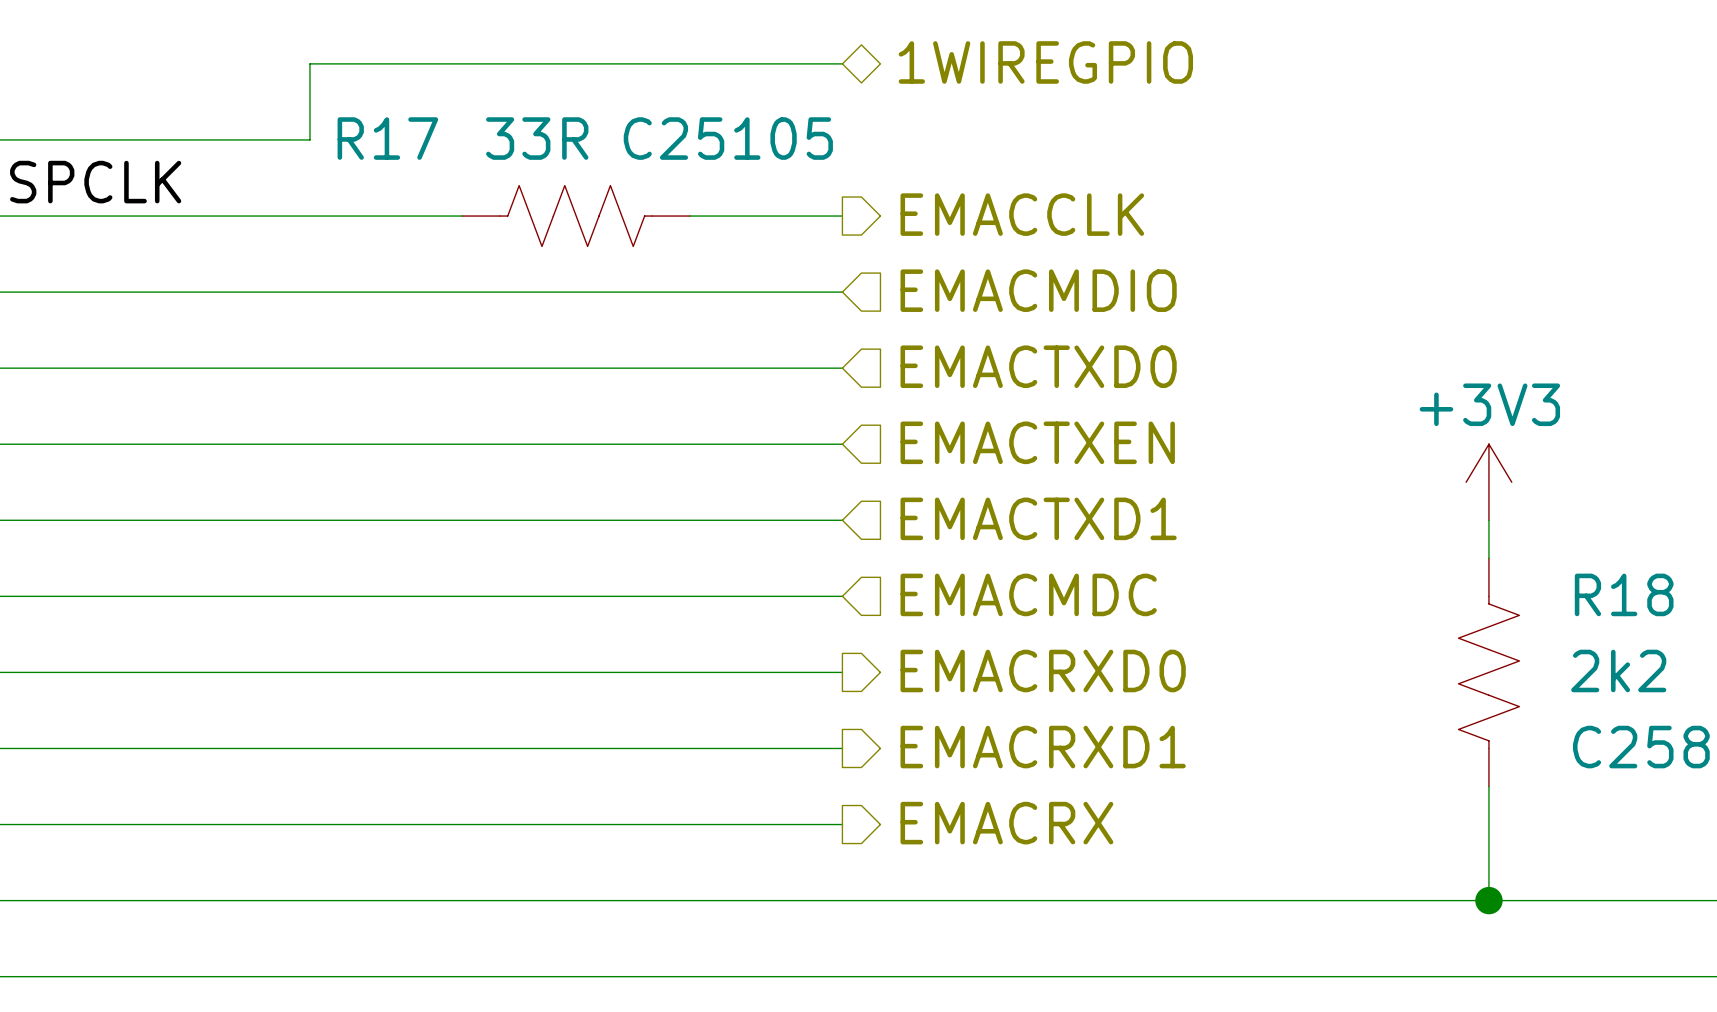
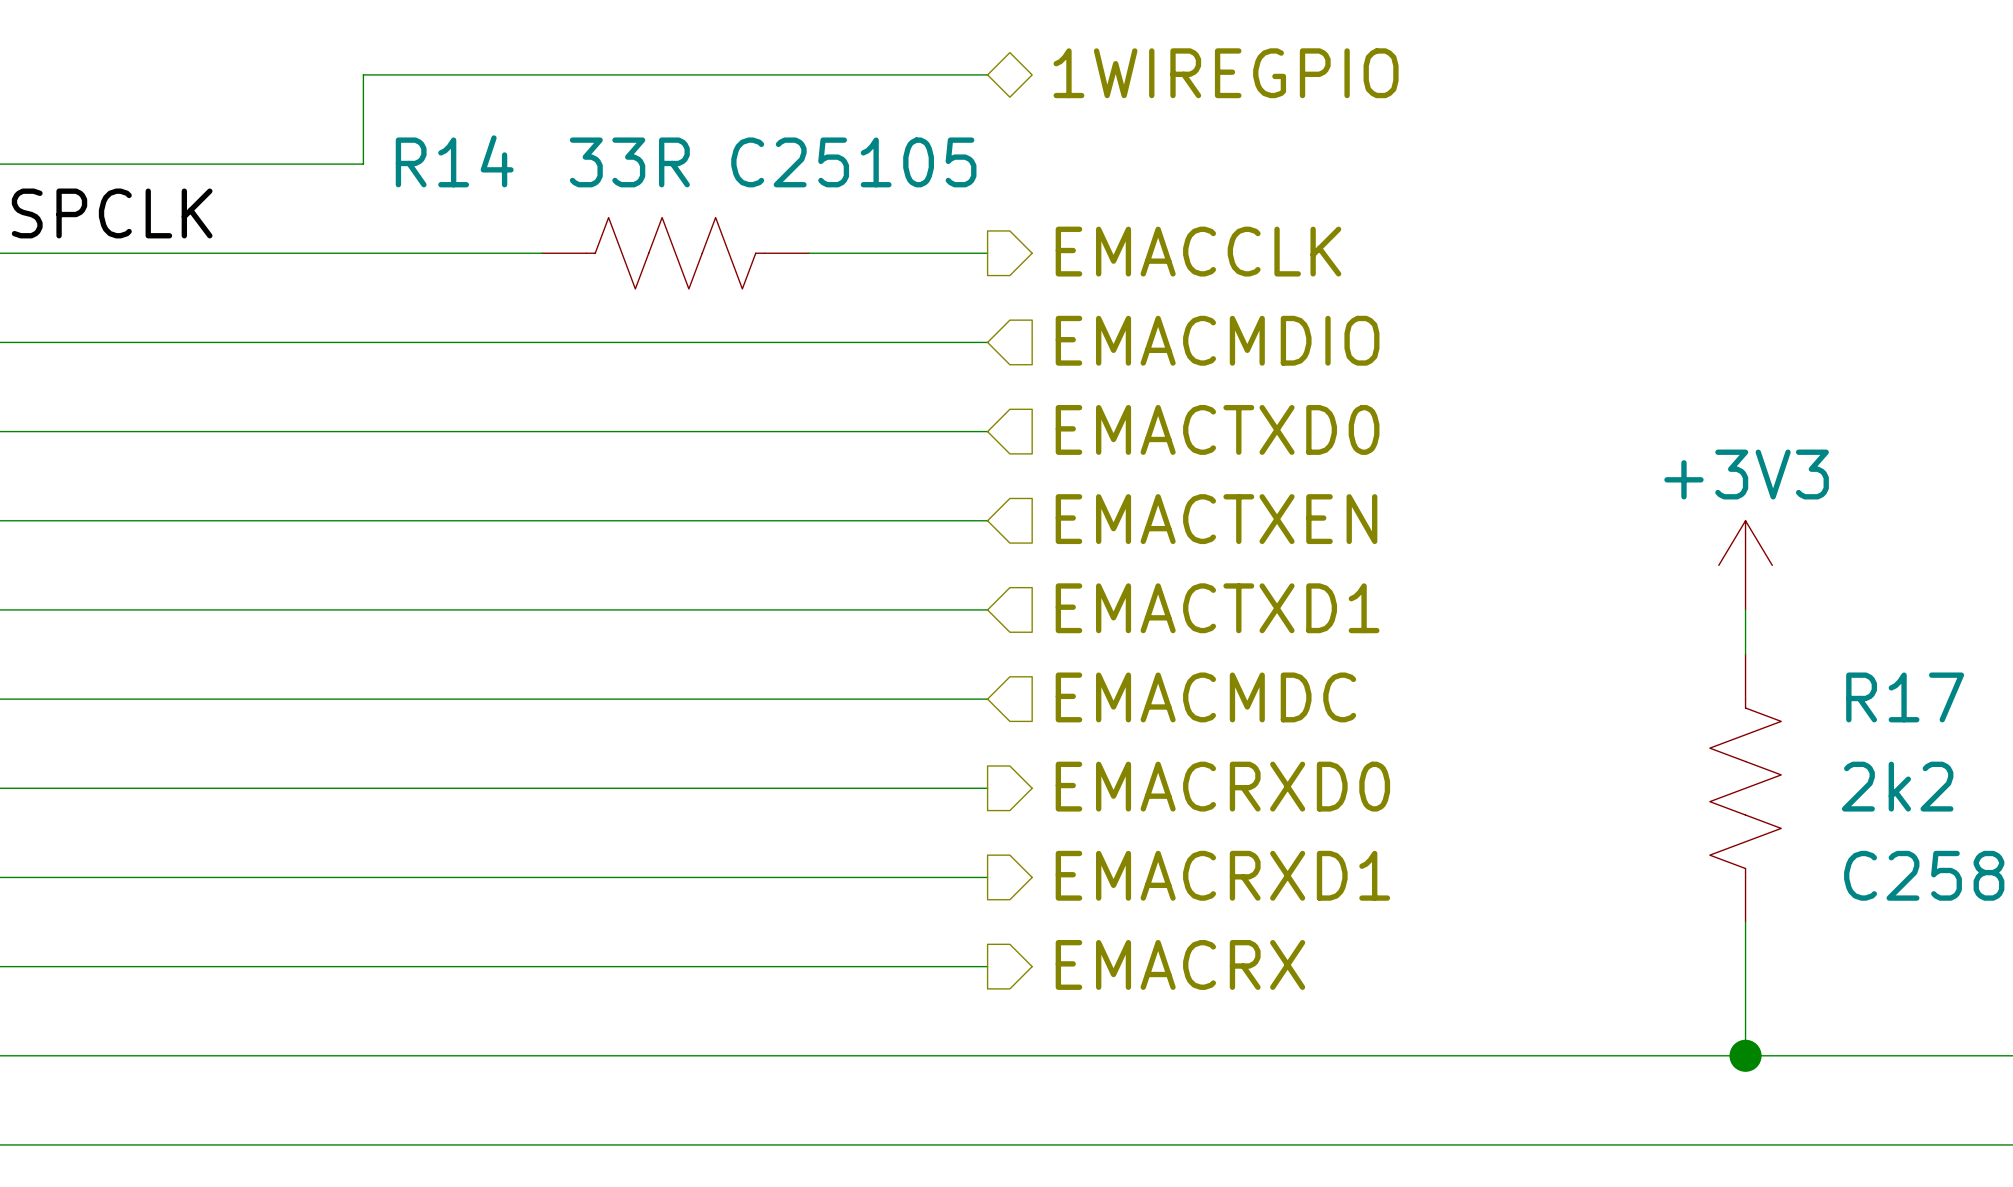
R17 name: R17 (387, 138) -> R14 (454, 161)
R18 name: R18 (1624, 594) -> R17 (1905, 697)

